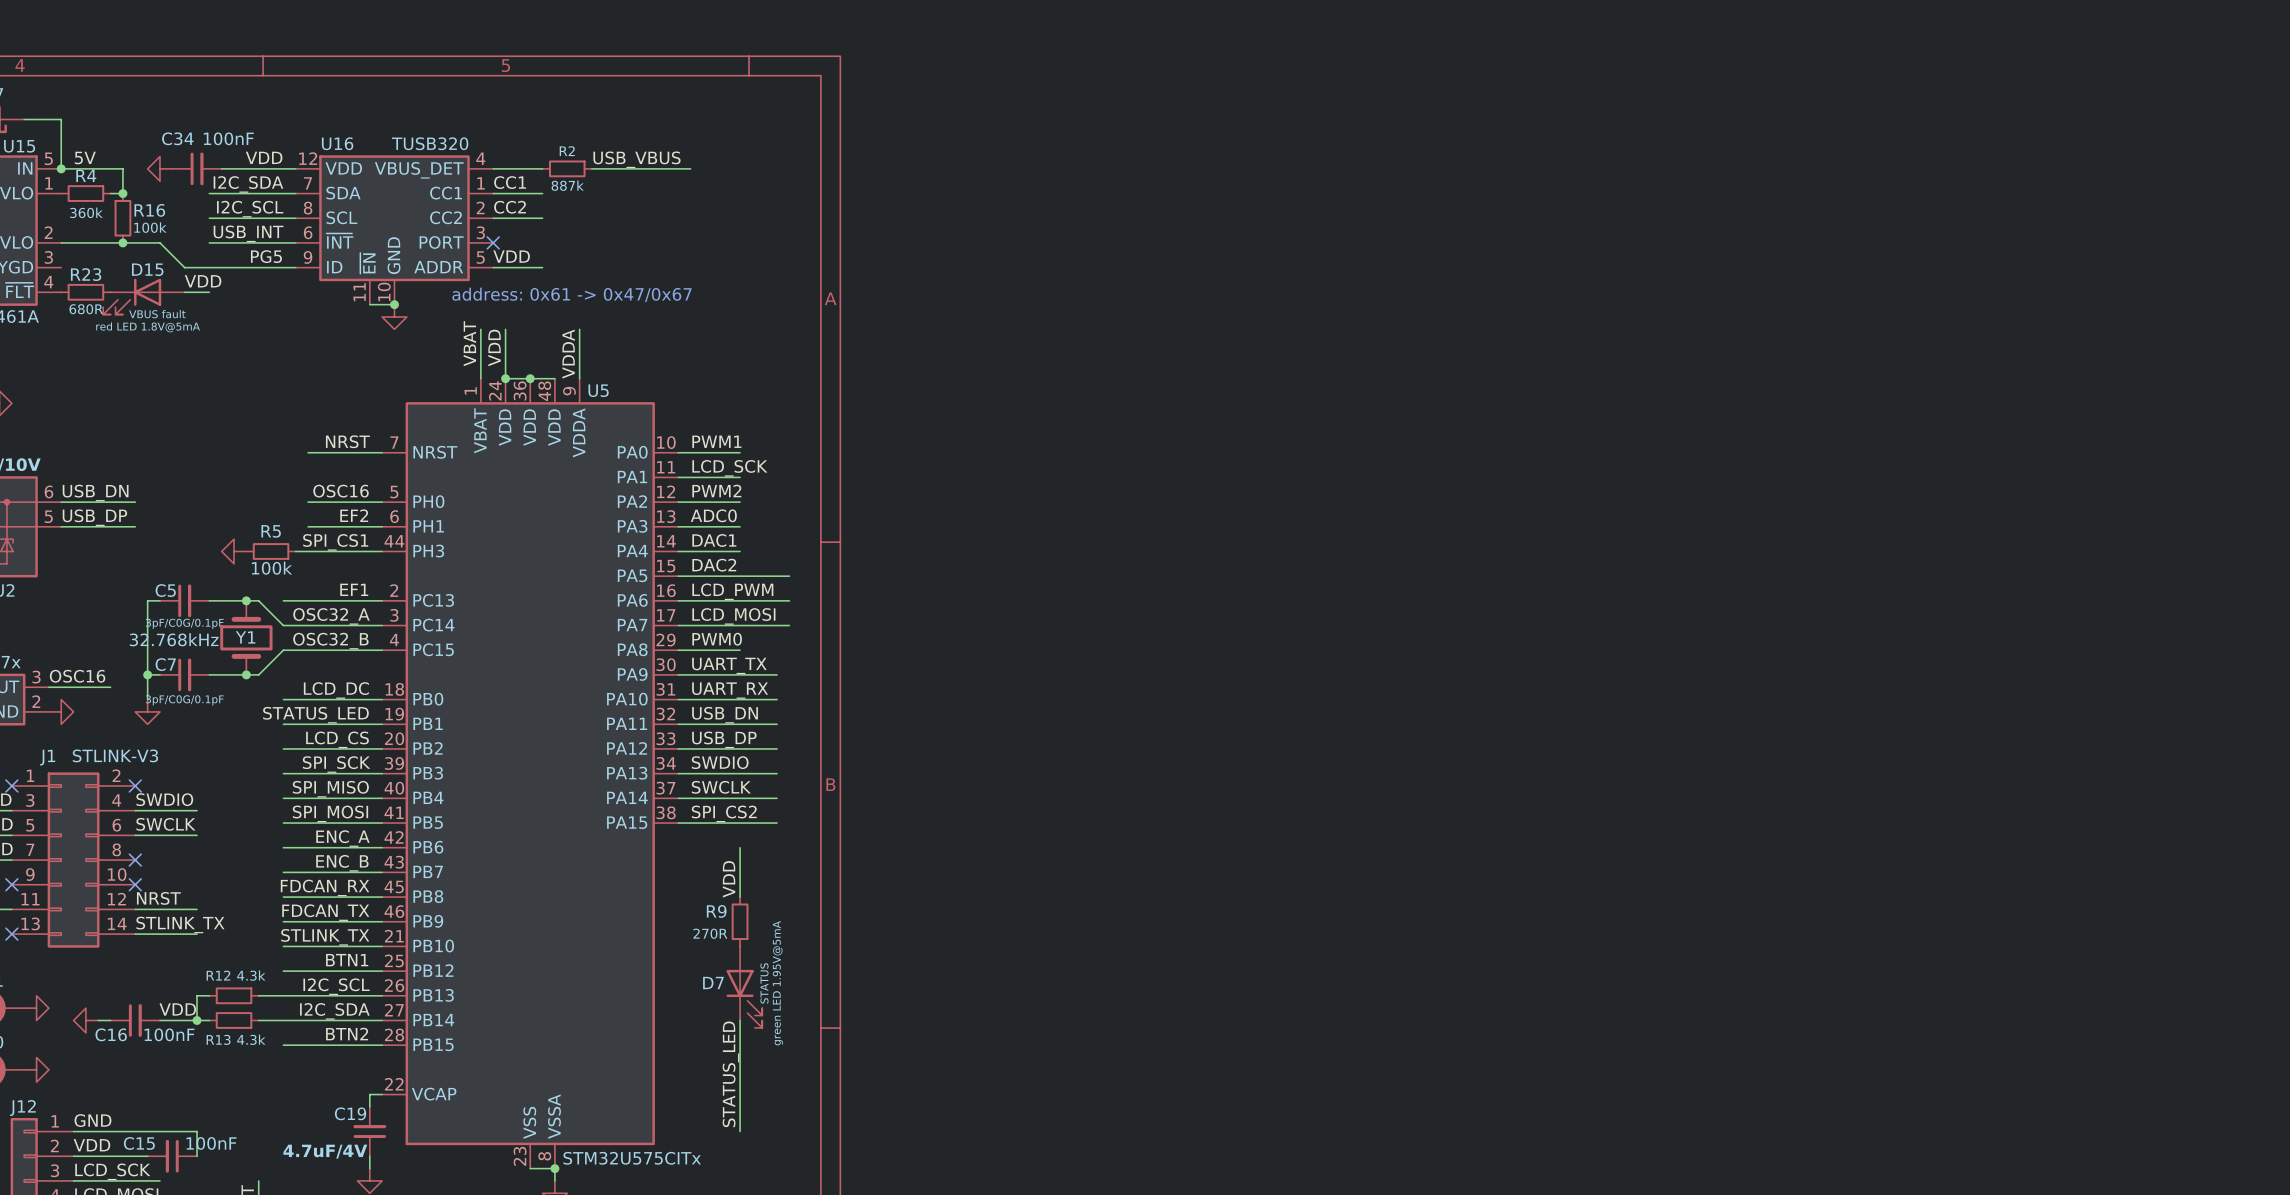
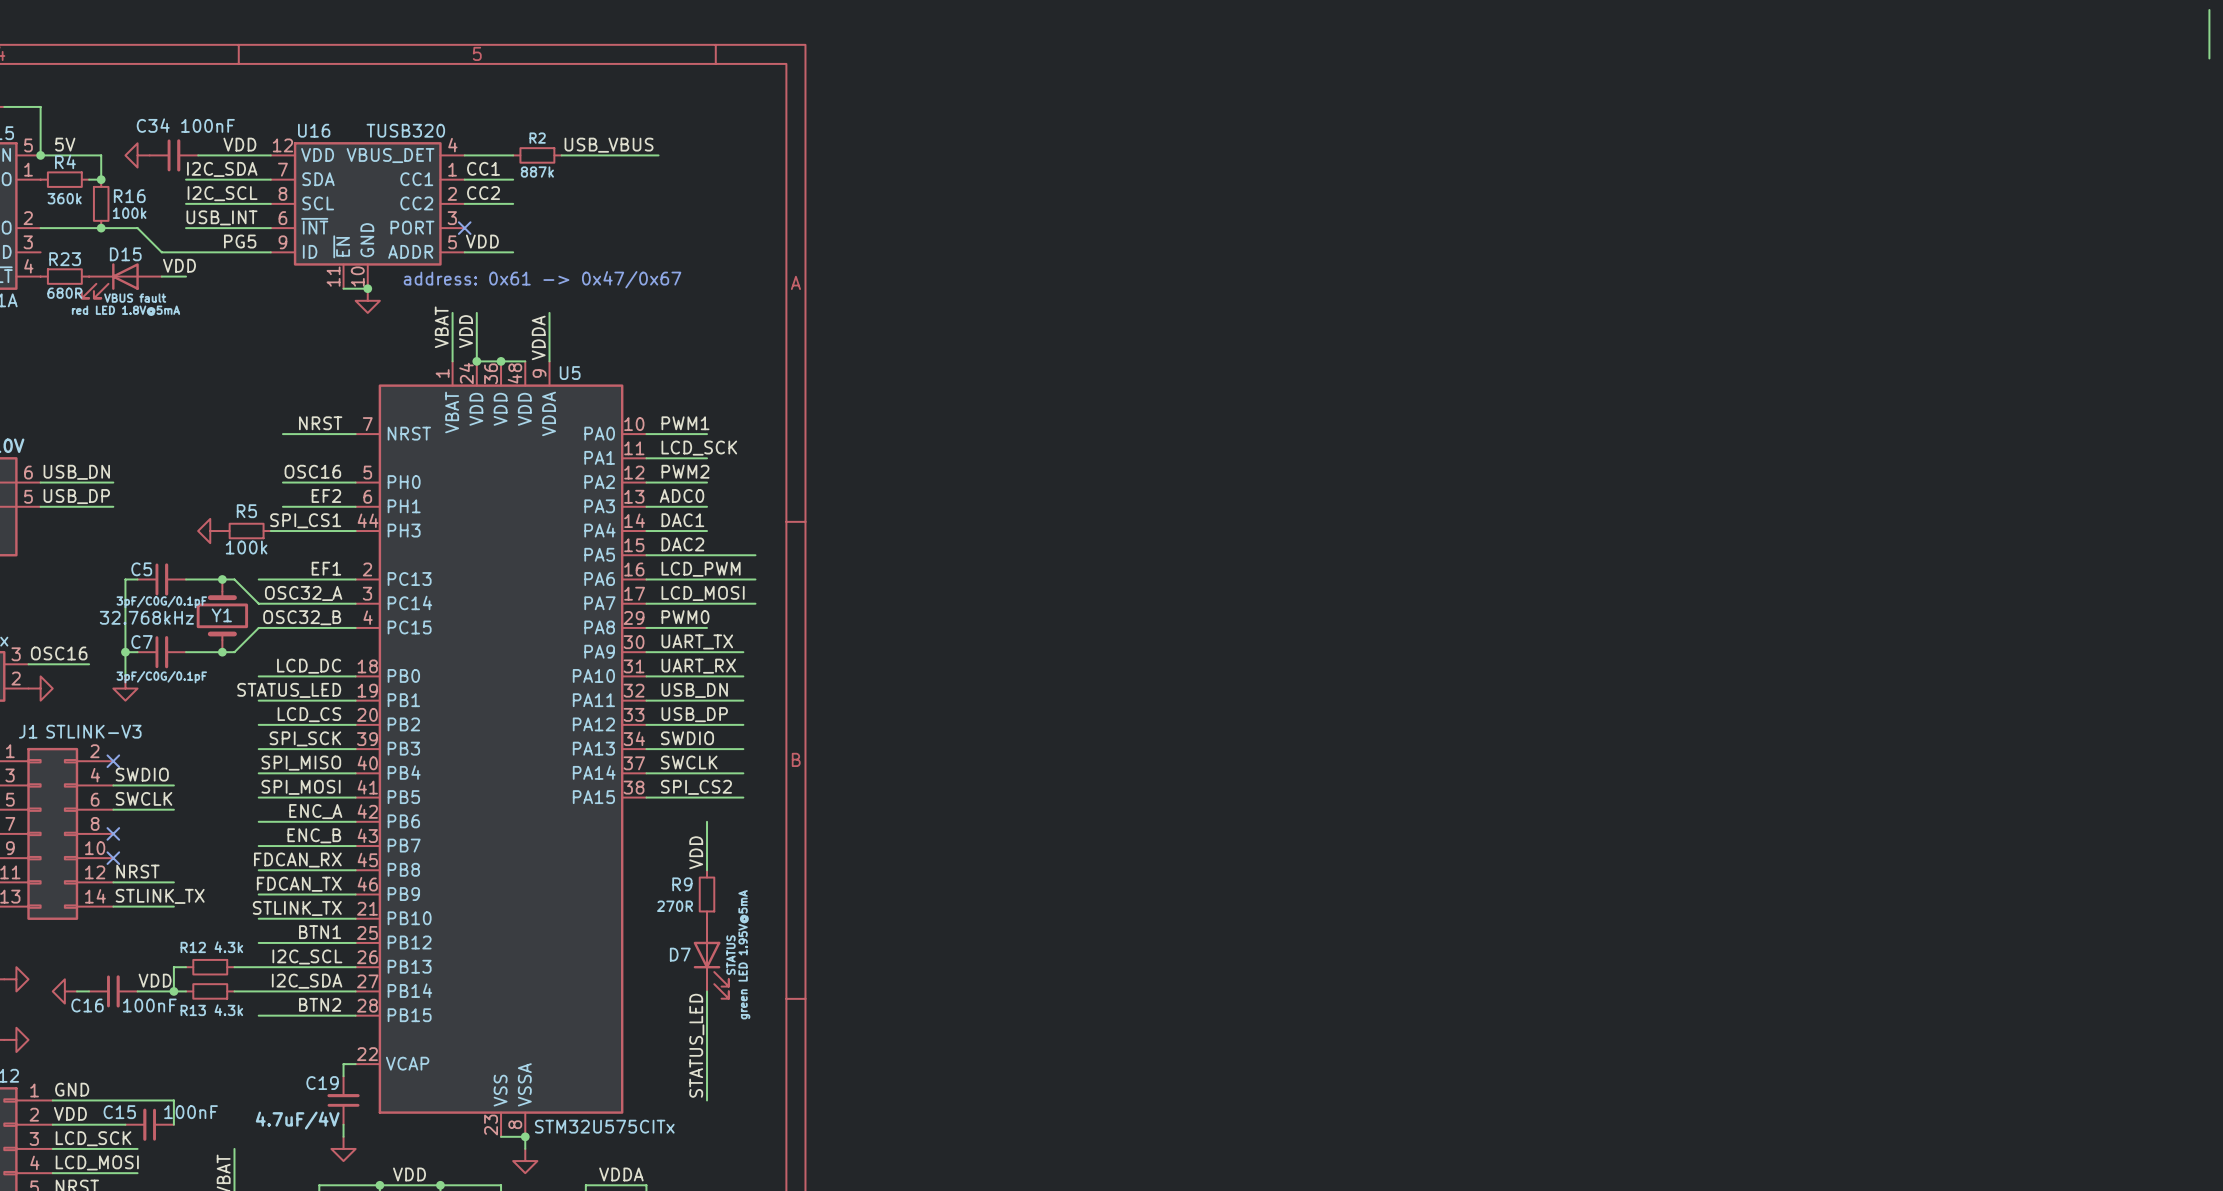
wire: none -> (2209, 10) (2209, 58)

